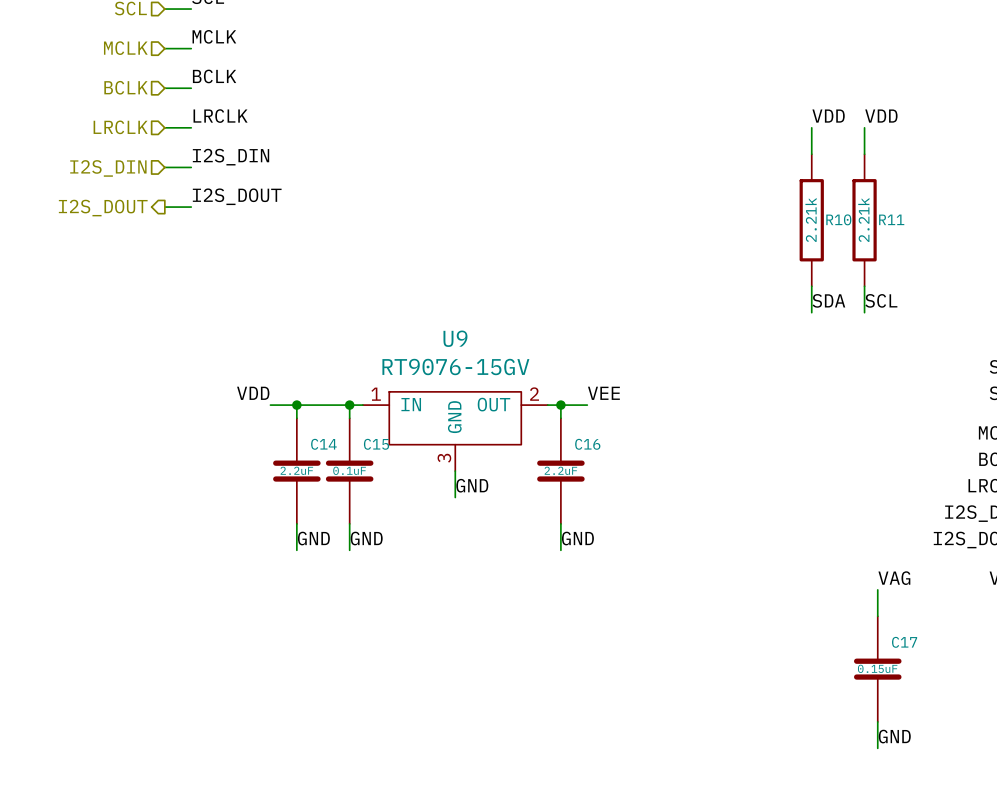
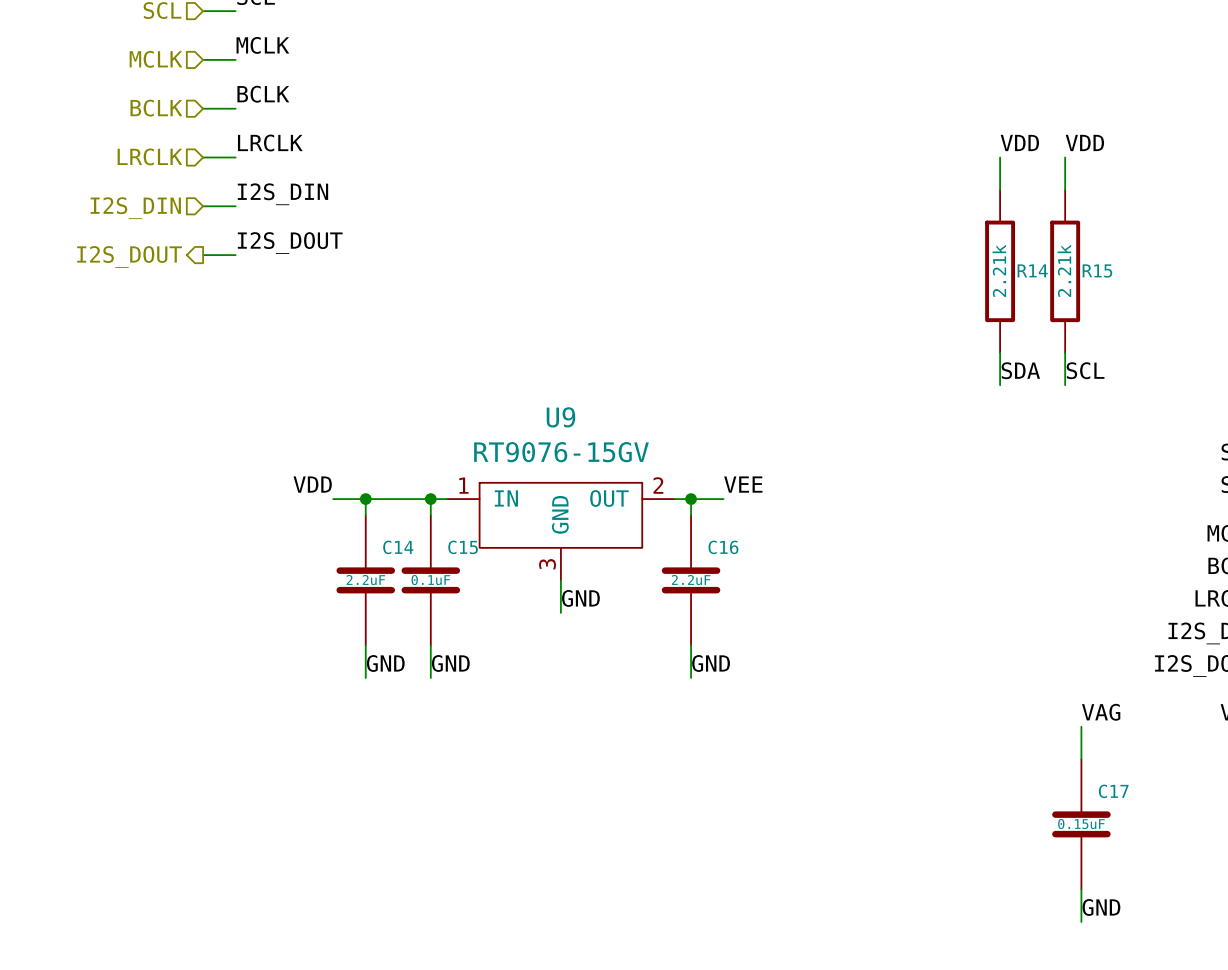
R10 name: R10 (838, 219) -> R14 (1032, 270)
R11 name: R11 (891, 219) -> R15 (1097, 271)

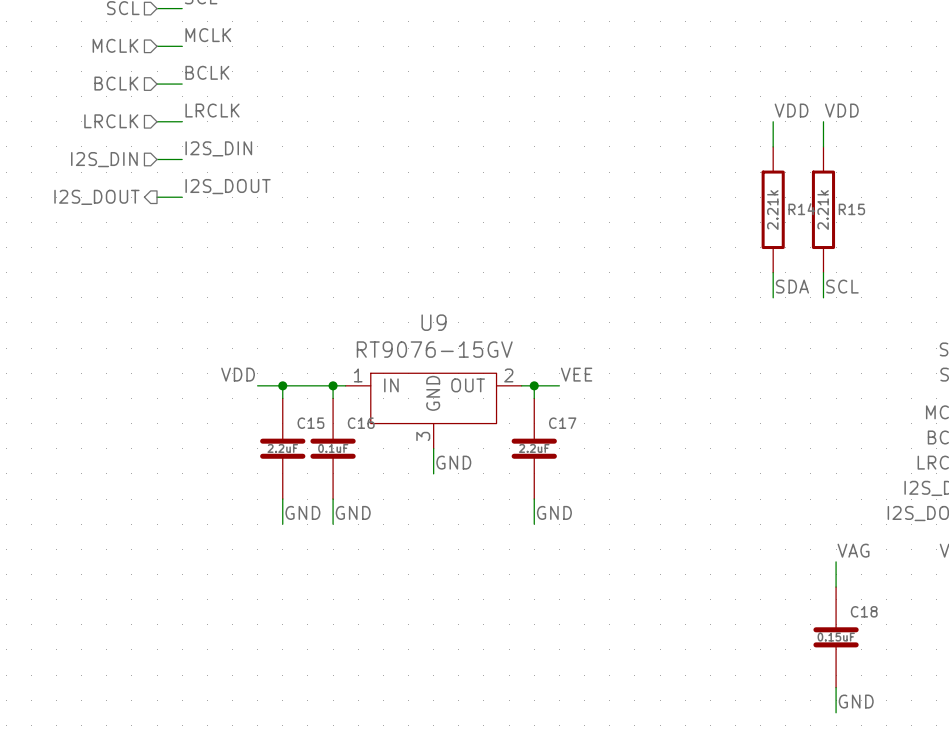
C14 name: C14 (398, 547) -> C15 (310, 423)
C15 name: C15 (463, 547) -> C16 (361, 423)
C16 name: C16 (723, 547) -> C17 (562, 423)
C17 name: C17 (1113, 791) -> C18 (864, 611)

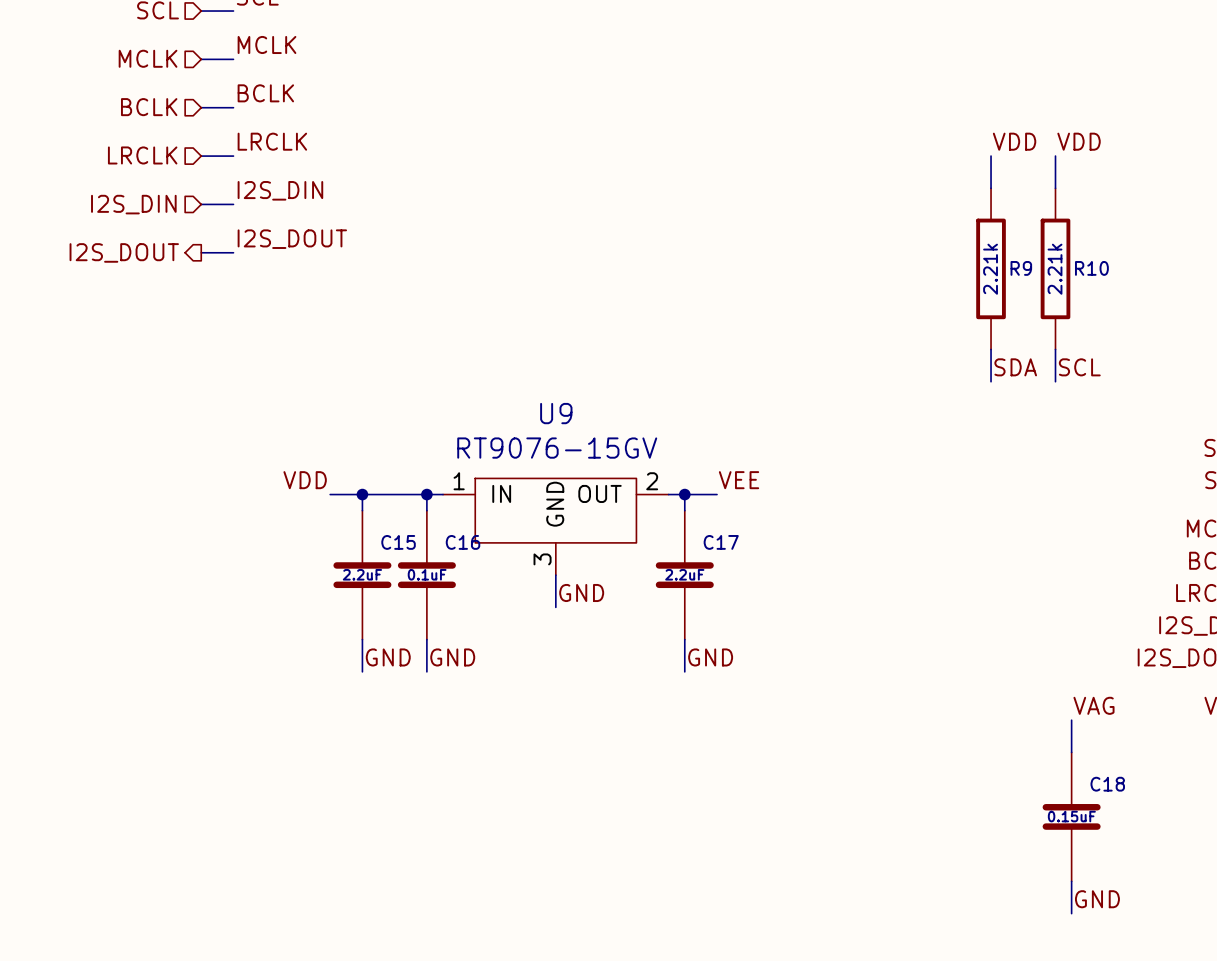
R14 name: R14 (801, 209) -> R9 (1021, 268)
R15 name: R15 (851, 209) -> R10 (1091, 268)

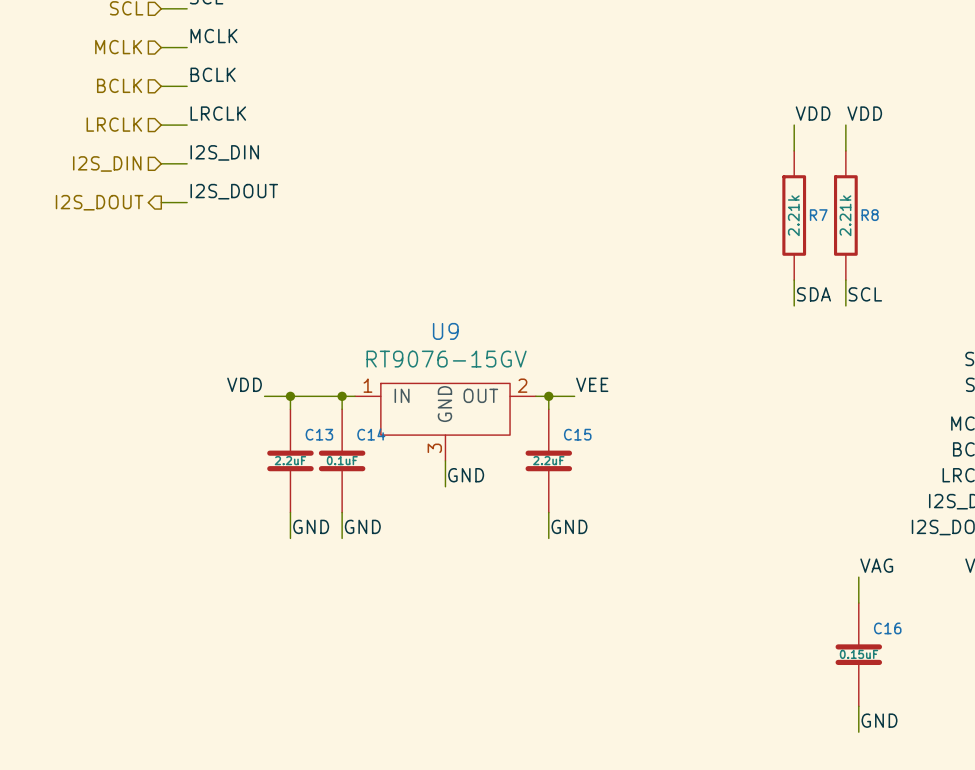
R9 name: R9 (1021, 268) -> R7 (818, 215)
R10 name: R10 (1091, 268) -> R8 (870, 215)
C15 name: C15 (398, 542) -> C13 (319, 434)
C16 name: C16 (463, 542) -> C14 (371, 434)
C17 name: C17 (721, 542) -> C15 (577, 434)
C18 name: C18 (1107, 784) -> C16 (887, 628)

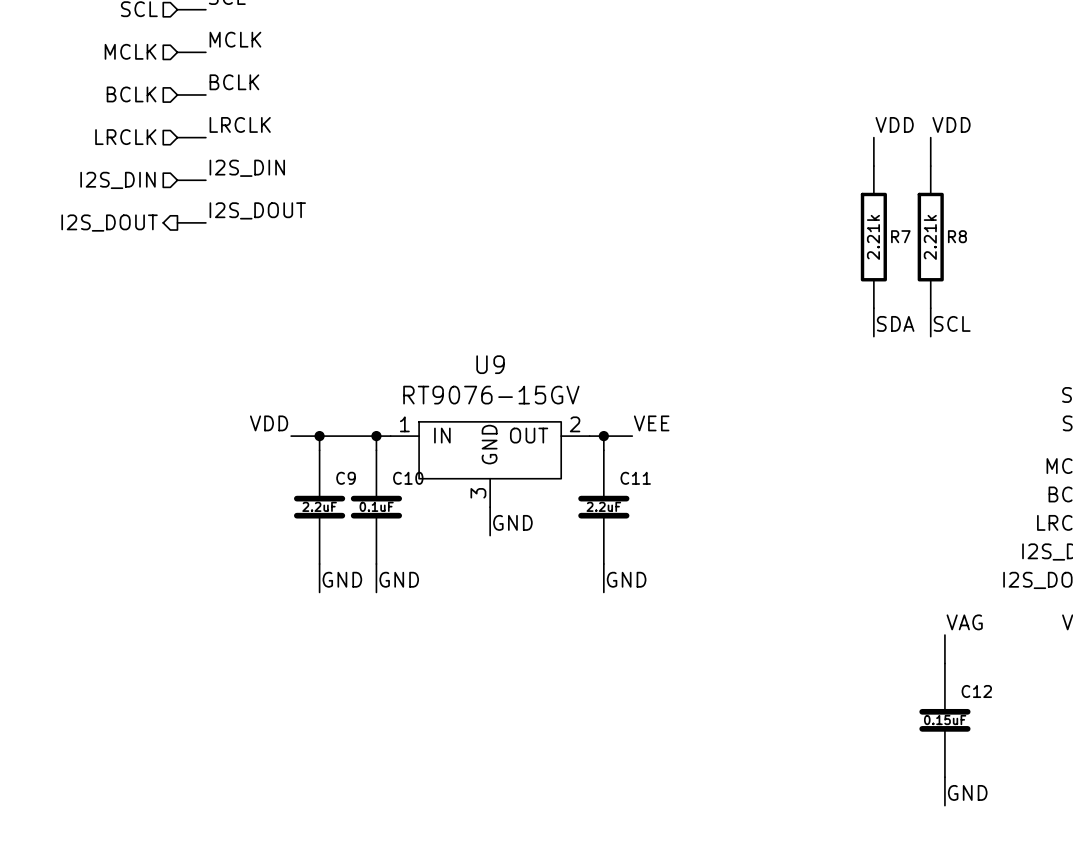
C13 name: C13 (319, 434) -> C9 (346, 478)
C14 name: C14 (371, 434) -> C10 (408, 478)
C15 name: C15 (577, 434) -> C11 (635, 478)
C16 name: C16 (887, 628) -> C12 (976, 691)

